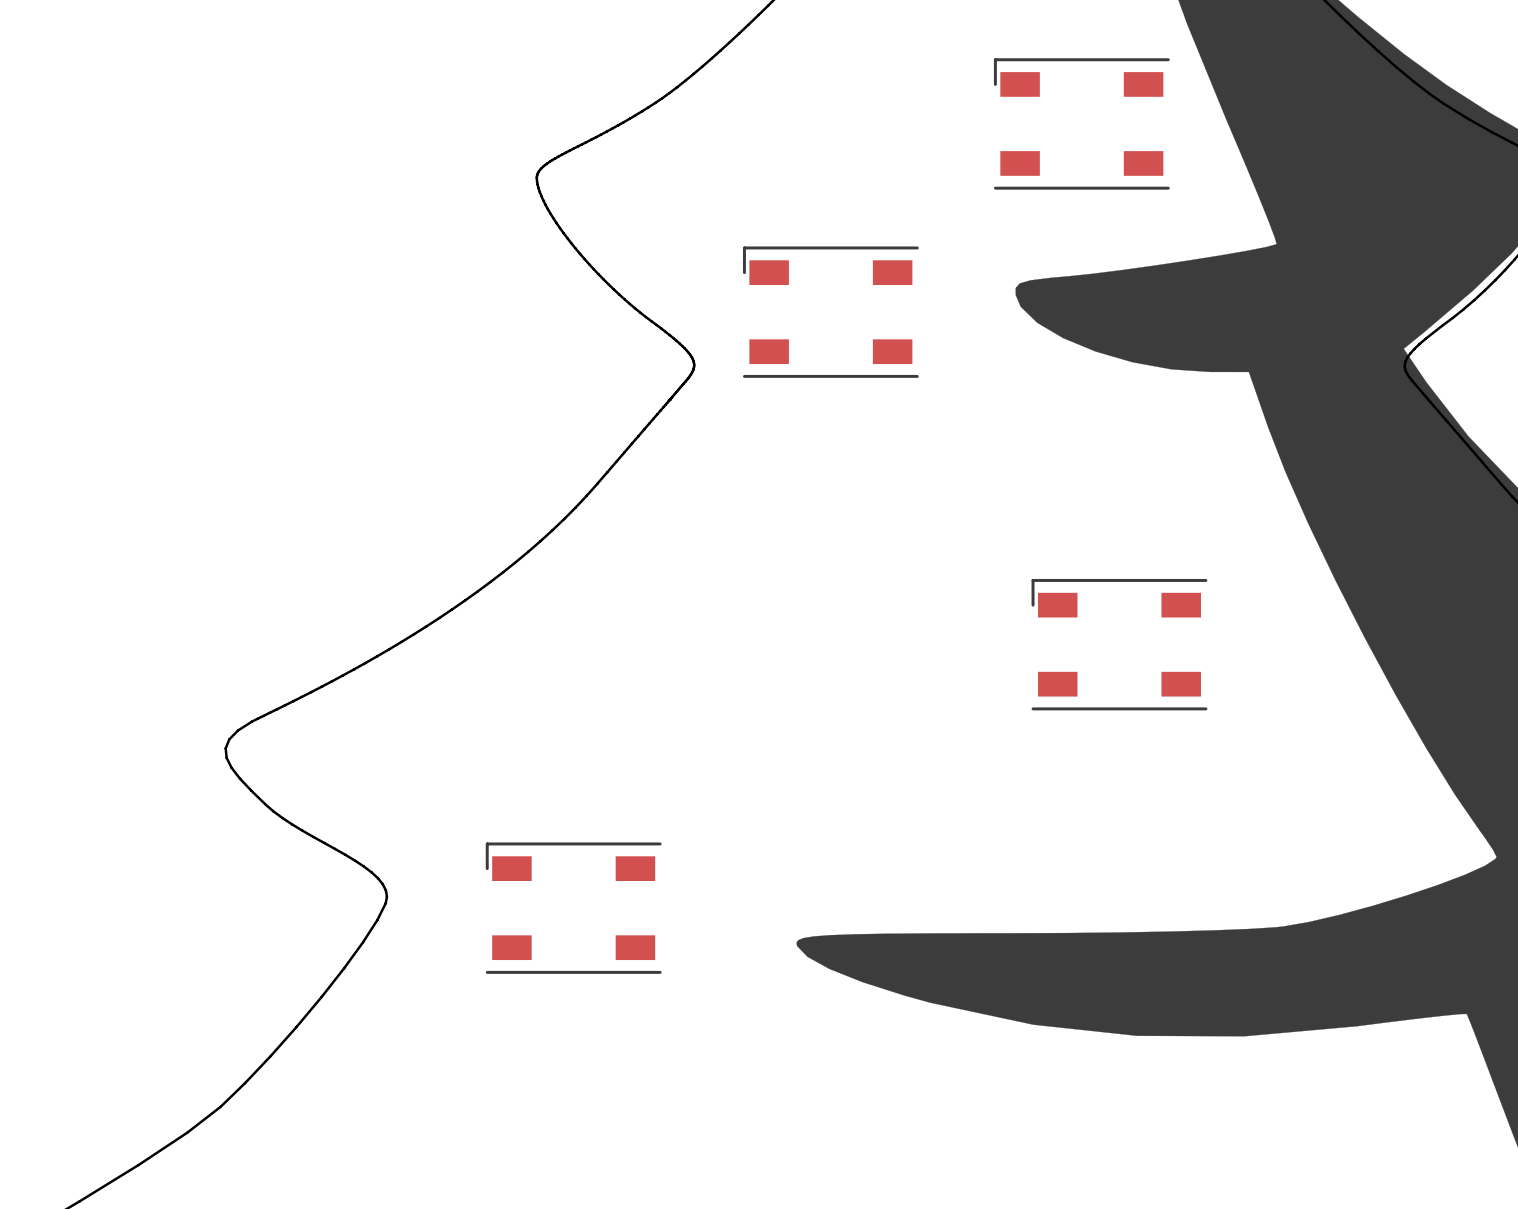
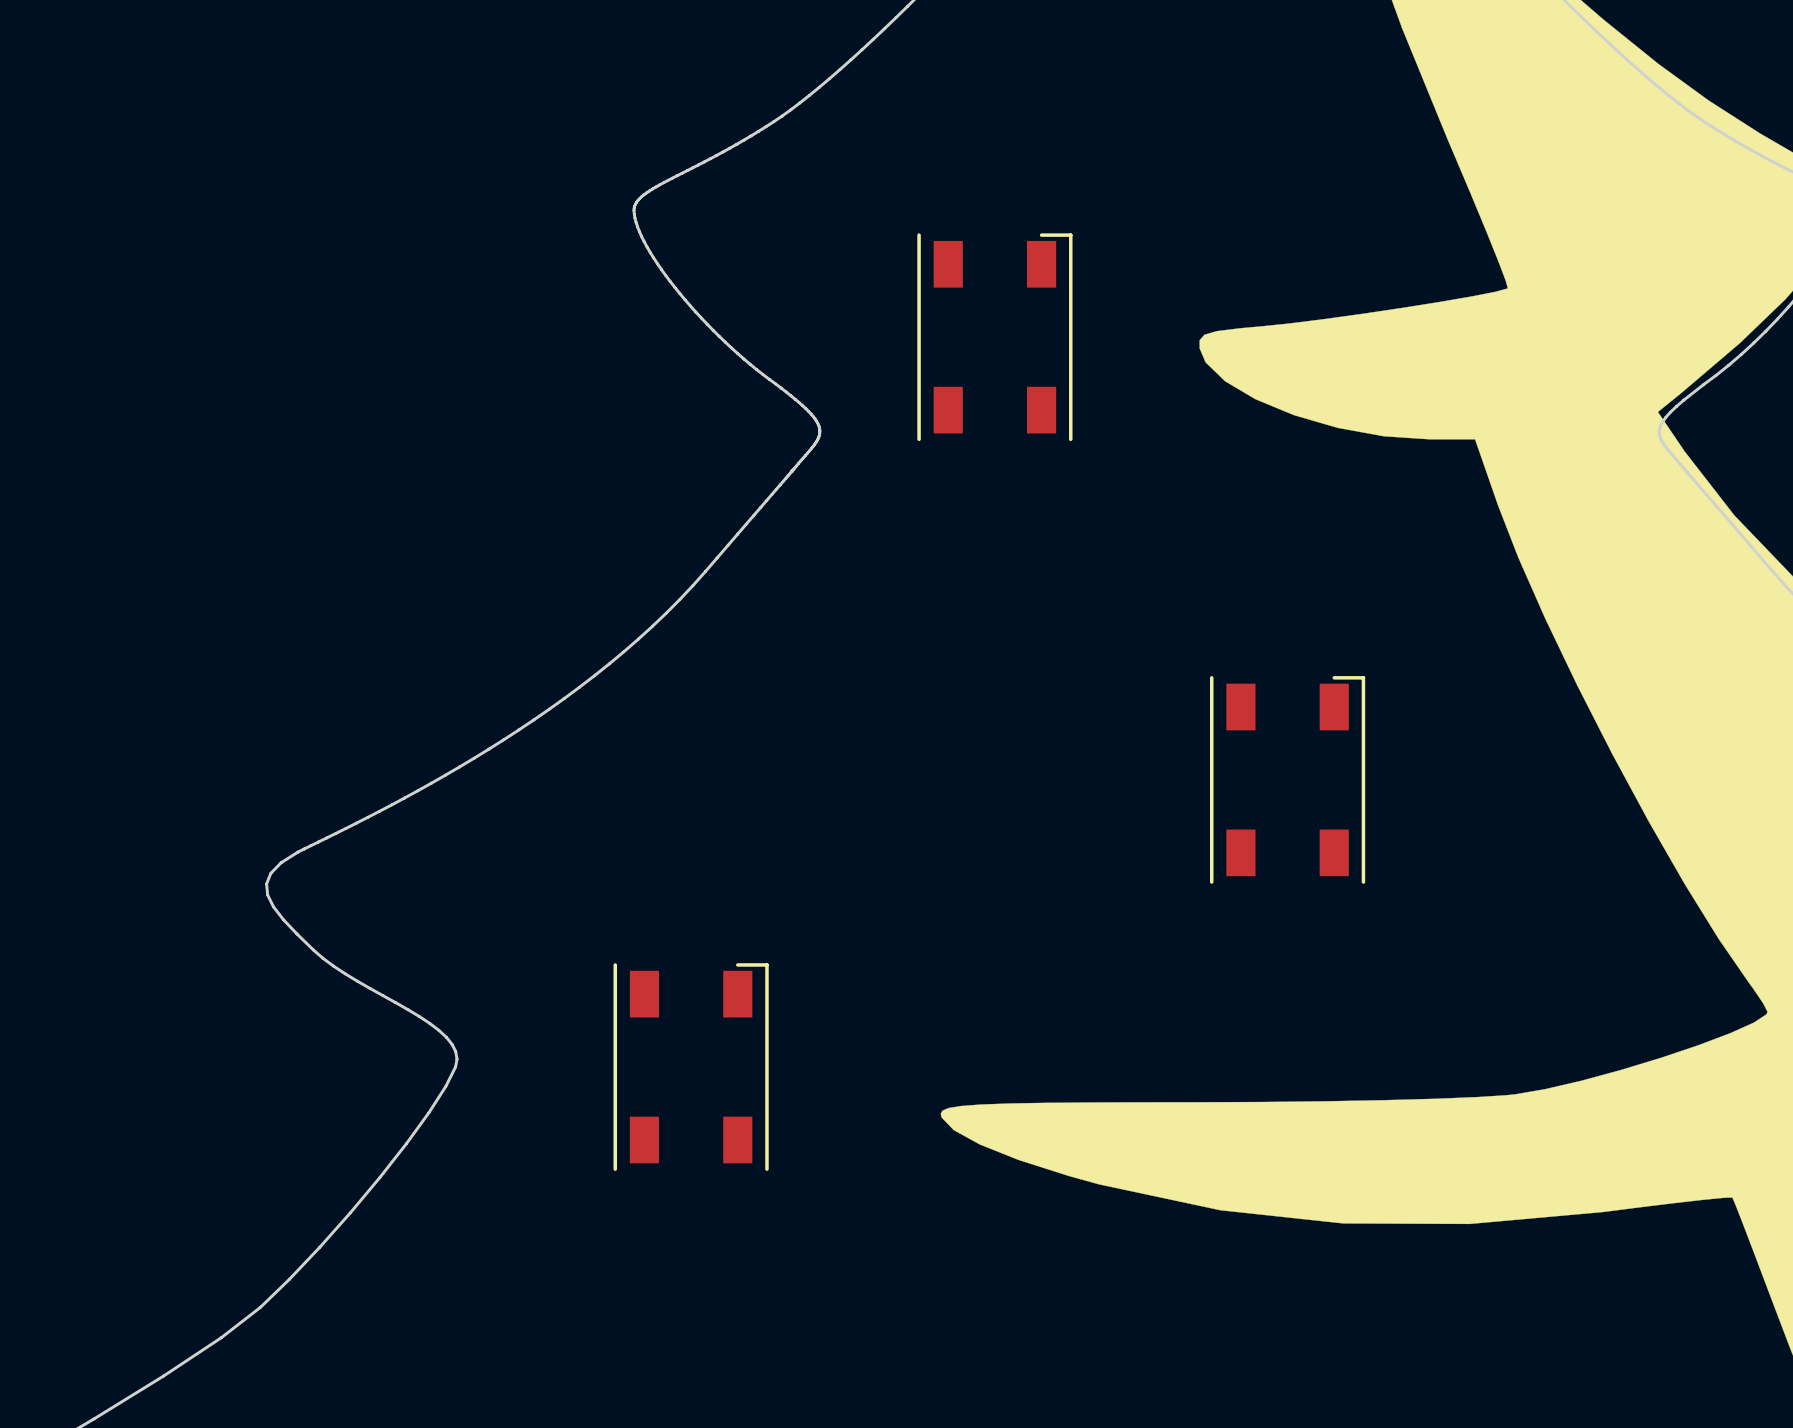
part: (1081, 123) -> none
part rotation: 0° (830, 312) -> 90° clockwise (994, 337)
part rotation: 0° (1119, 644) -> 90° clockwise (1287, 779)
part rotation: 0° (573, 908) -> 90° clockwise (691, 1067)

